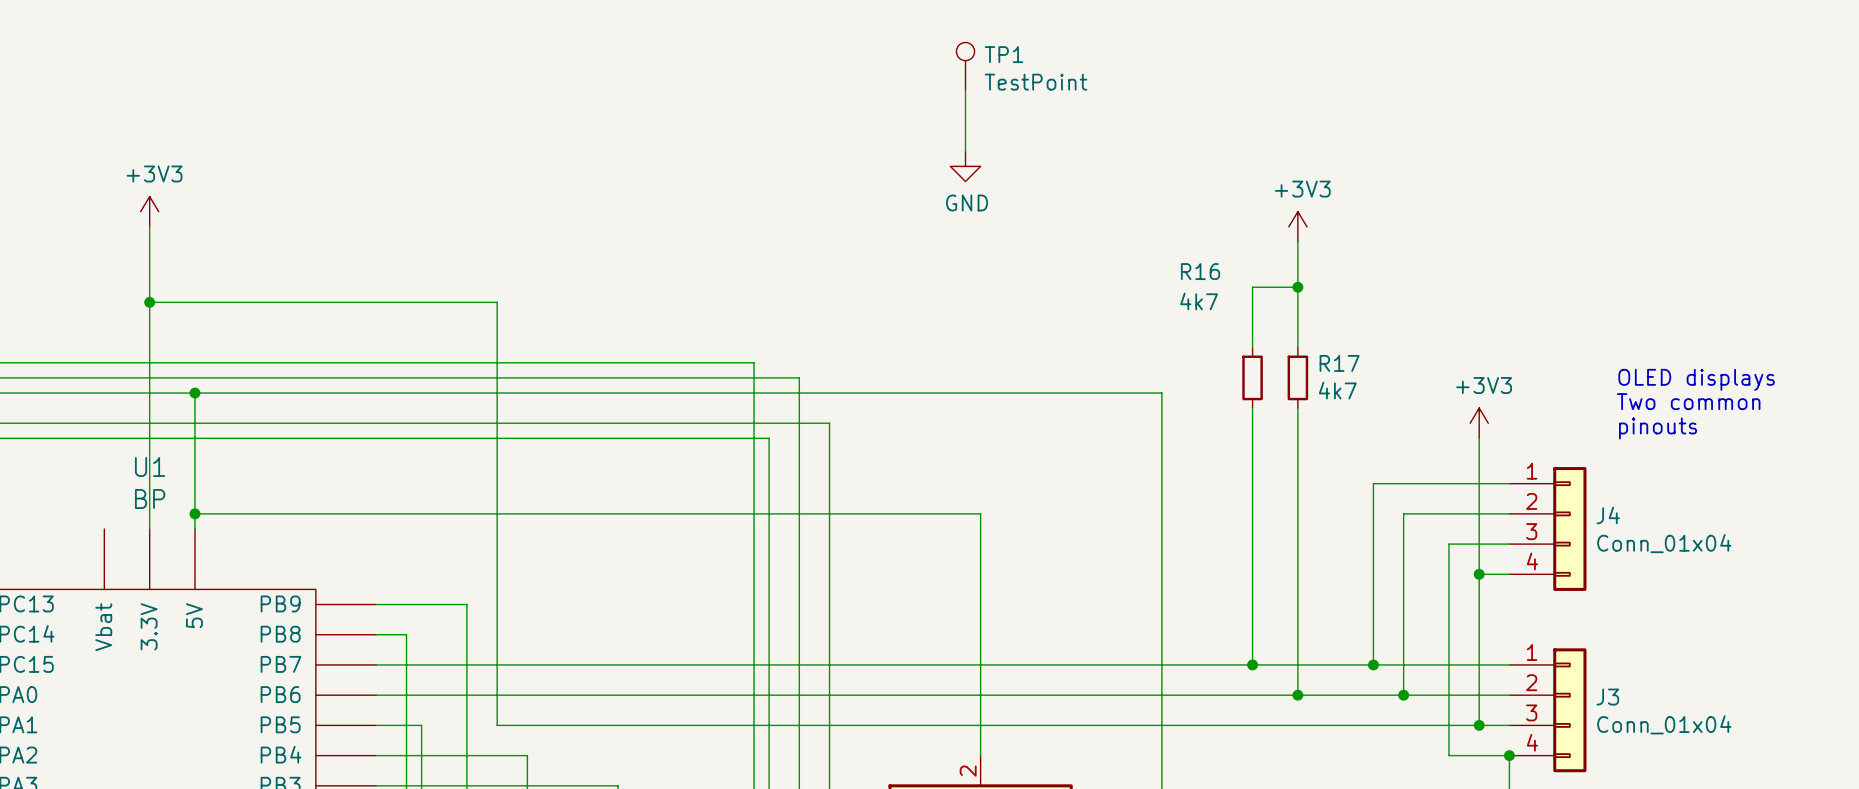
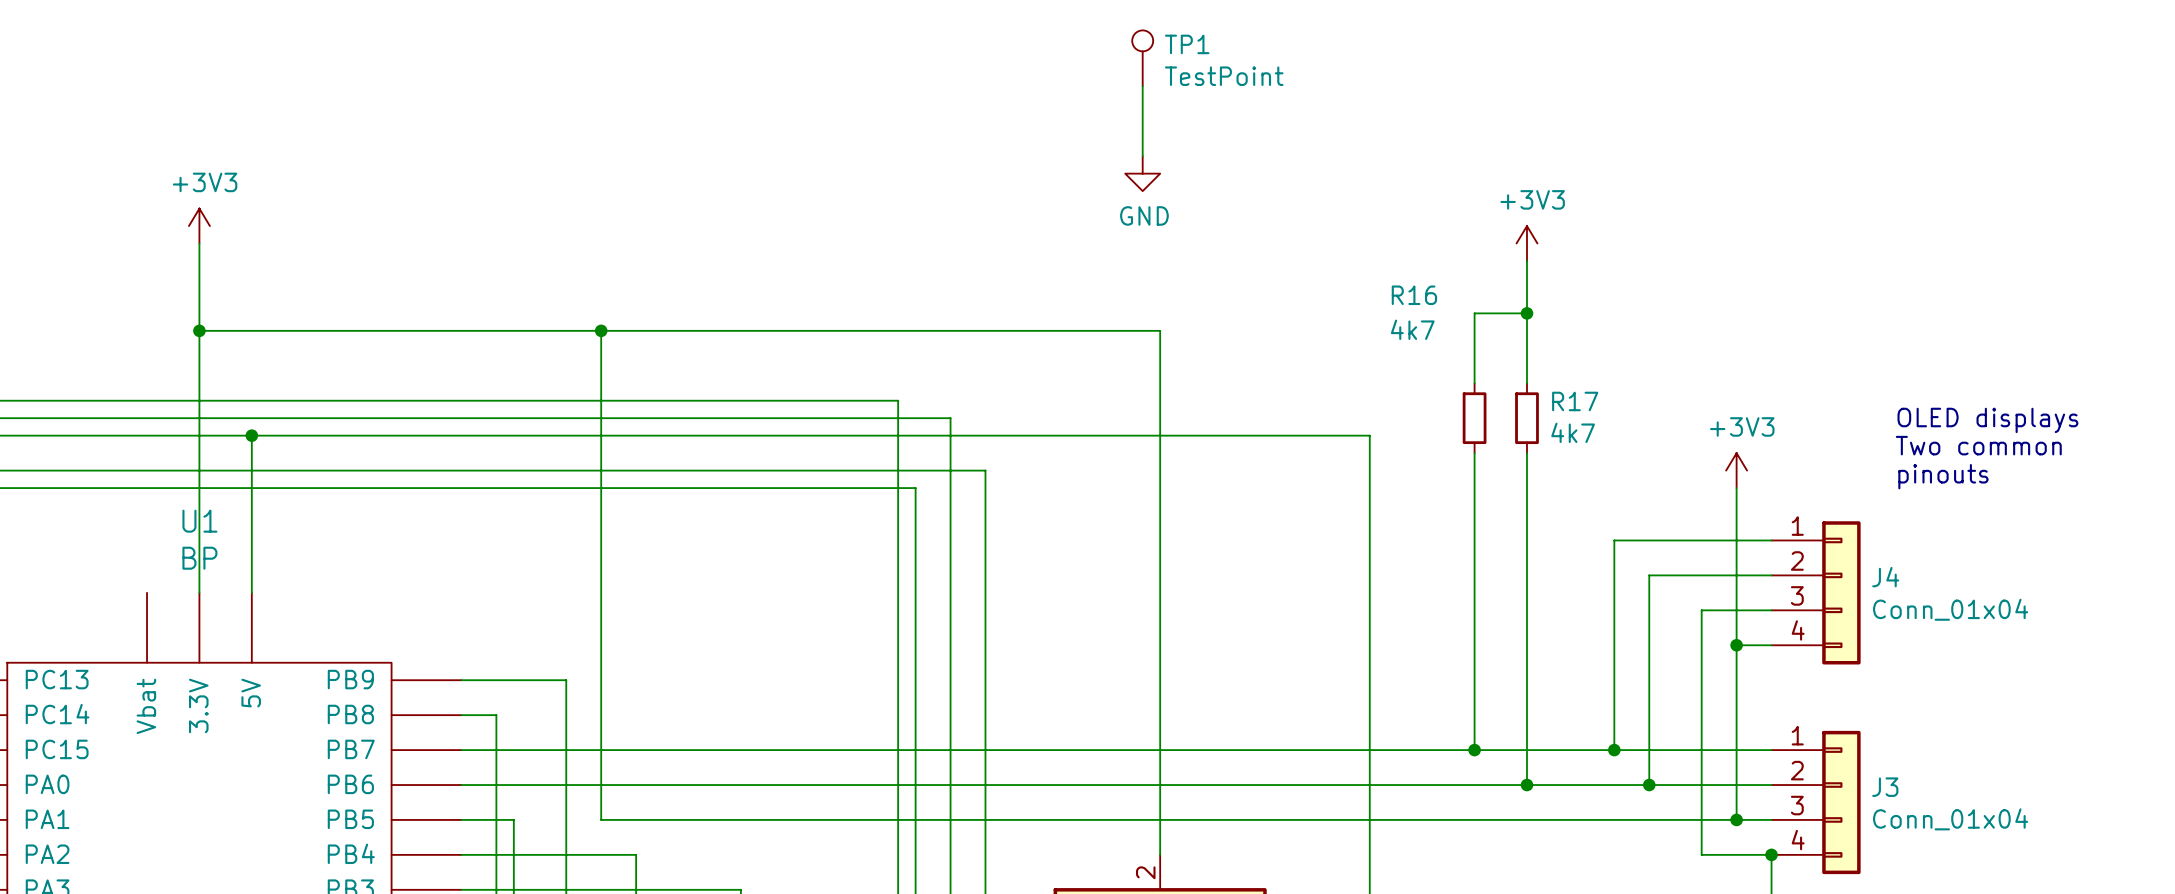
junction: none -> (601, 330)
wire: (194, 513) (980, 513) -> (601, 330) (1160, 330) (1160, 575)
junction: (194, 513) -> none

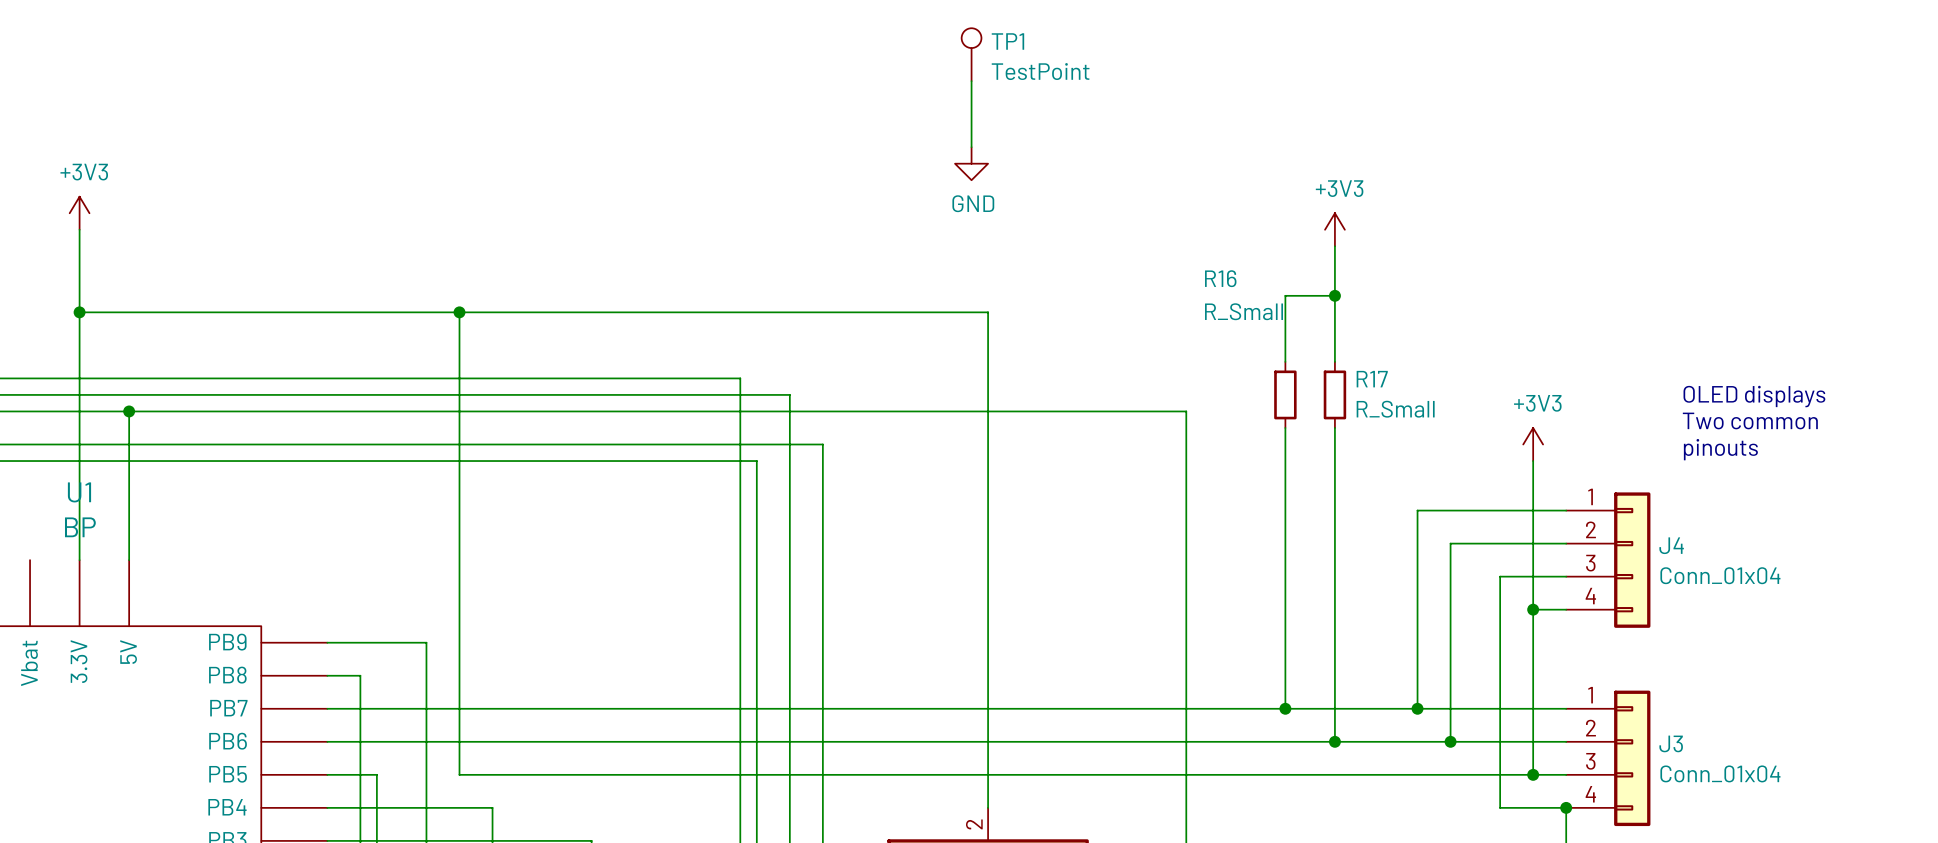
R16 value: 4k7 (1412, 329) -> R_Small (1244, 311)
R17 value: 4k7 (1573, 432) -> R_Small (1395, 409)

